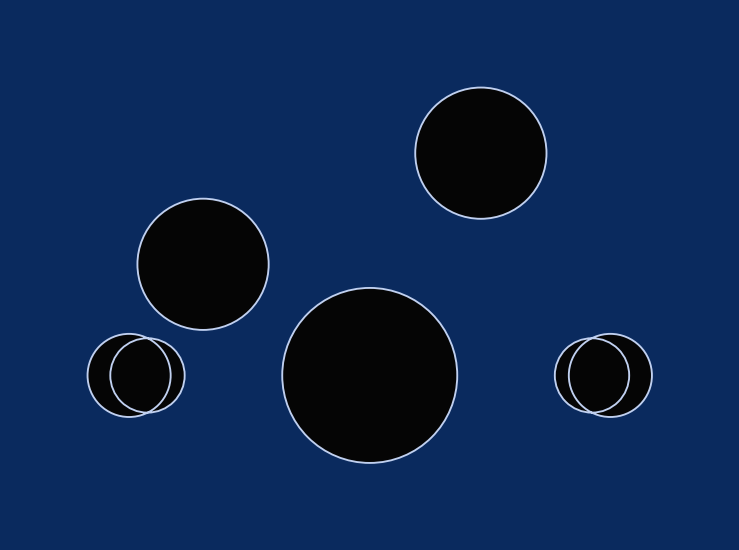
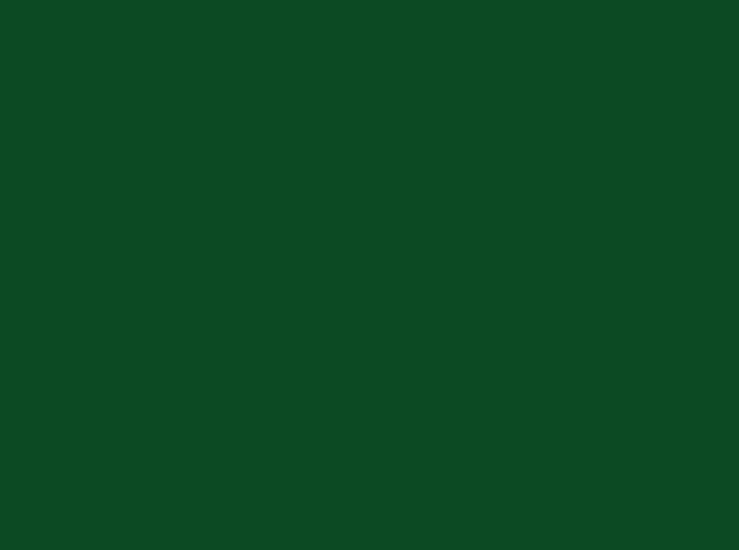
part: (369, 275) -> none

